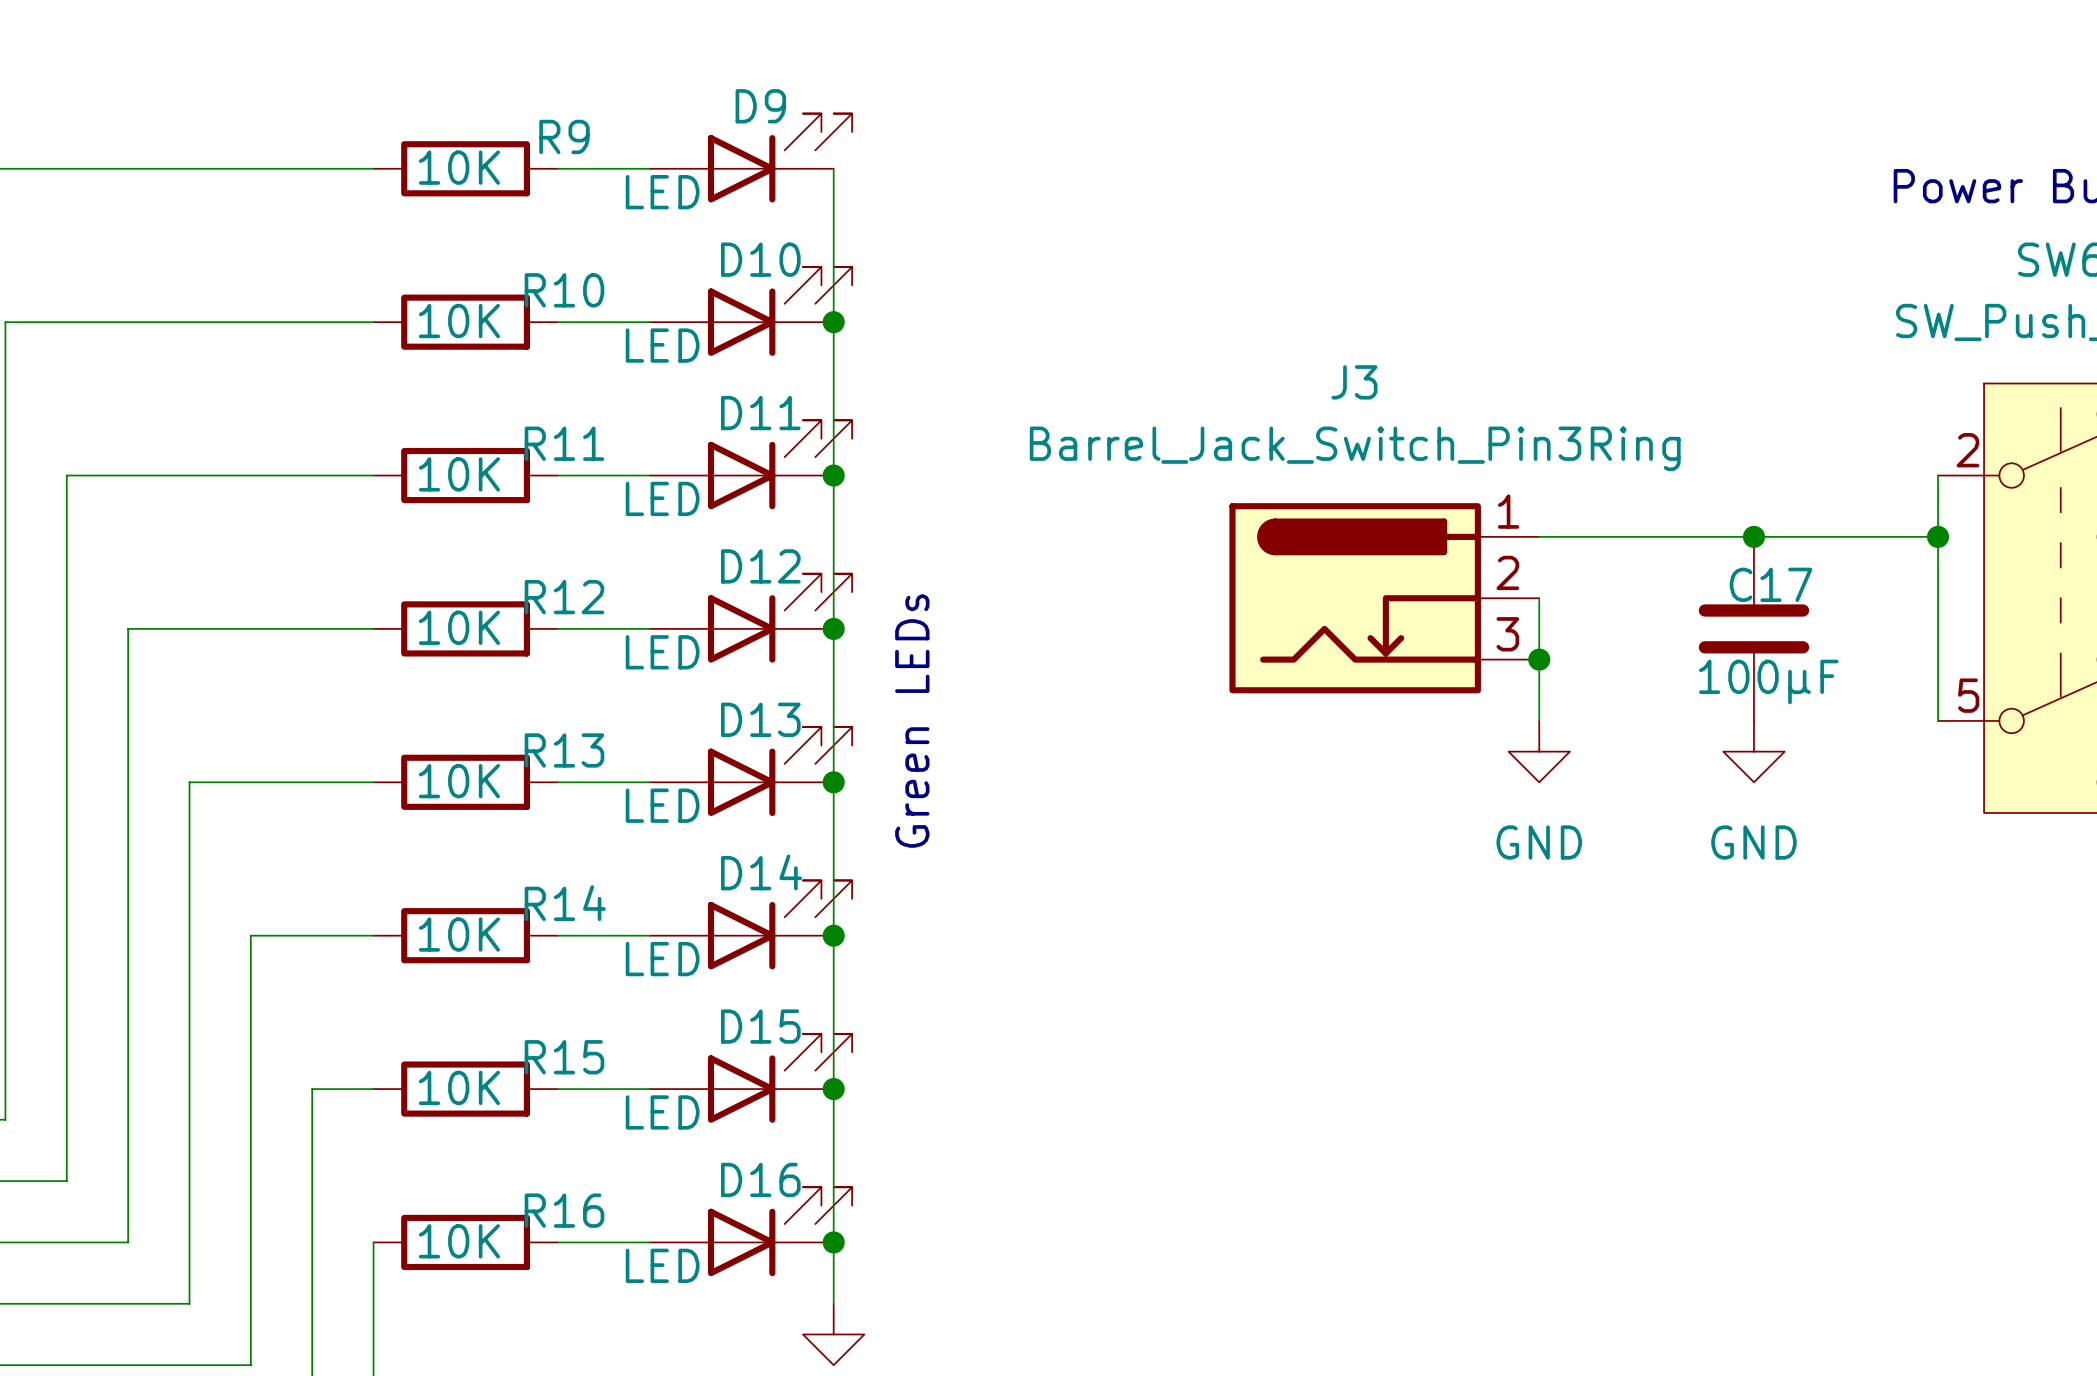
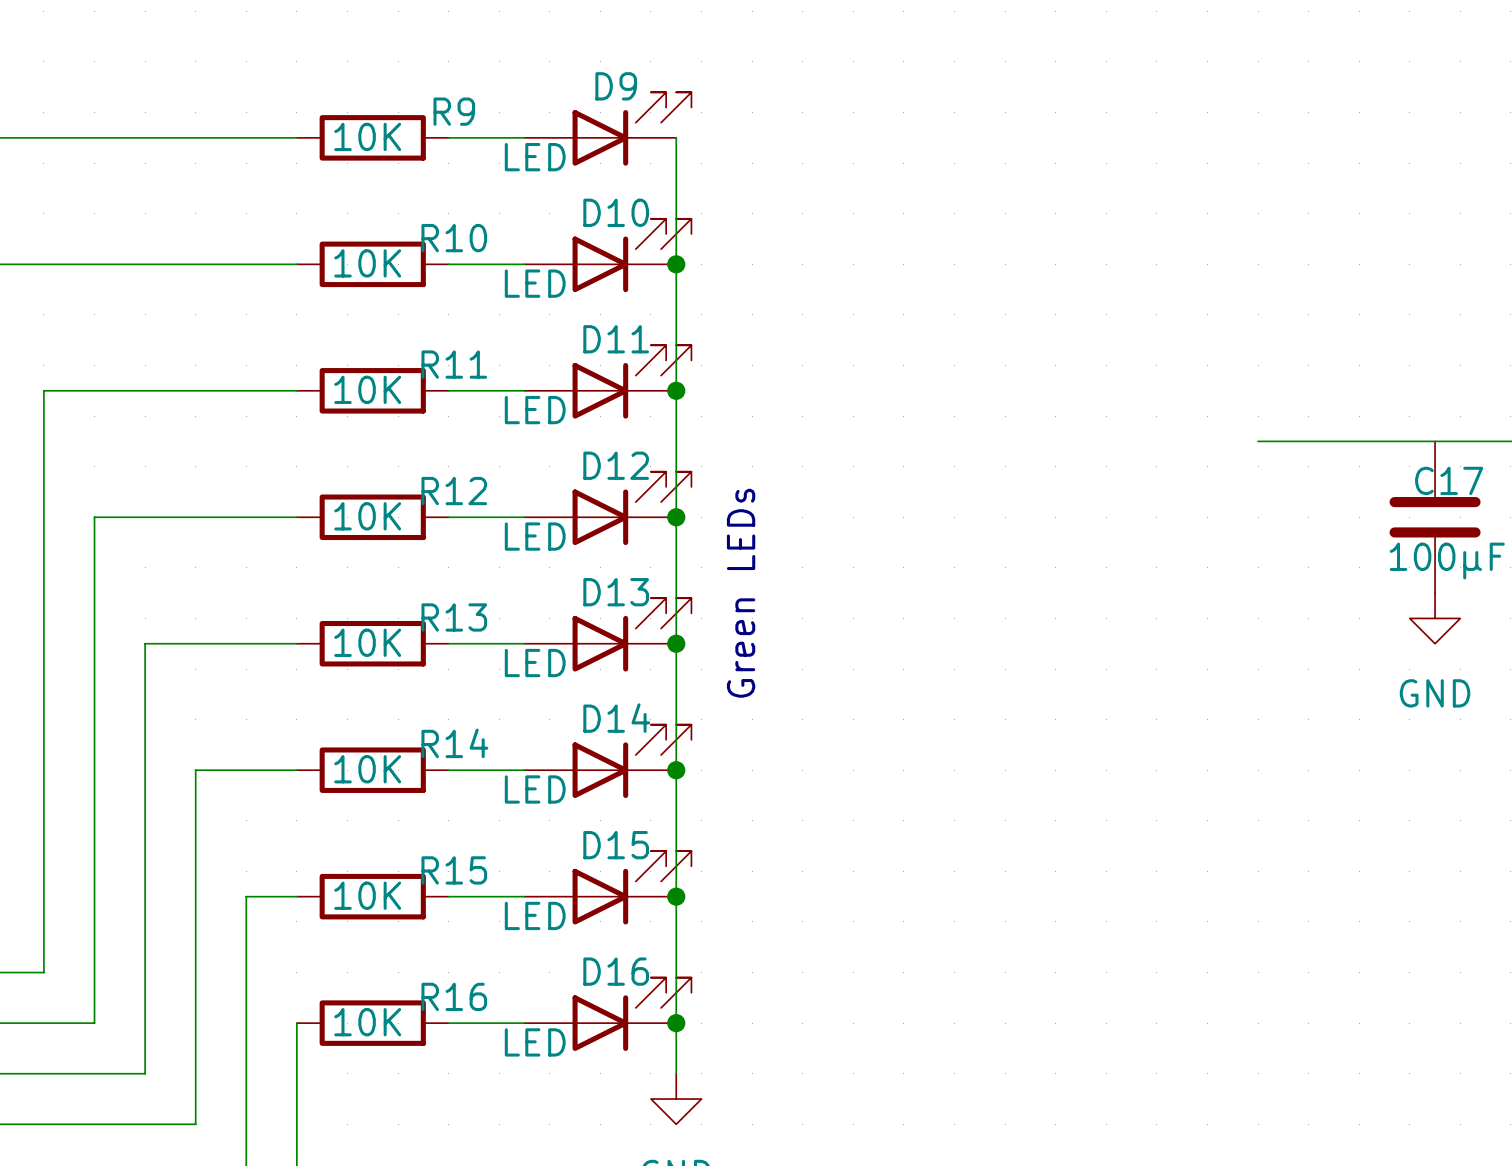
junction: (1753, 536) -> none
J3: Barrel_Jack_Switch_Pin3Ring (1384, 598) -> none
wire: (1539, 598) (1539, 720) -> none
junction: (1539, 659) -> none
power symbol: GND (1539, 751) -> none

